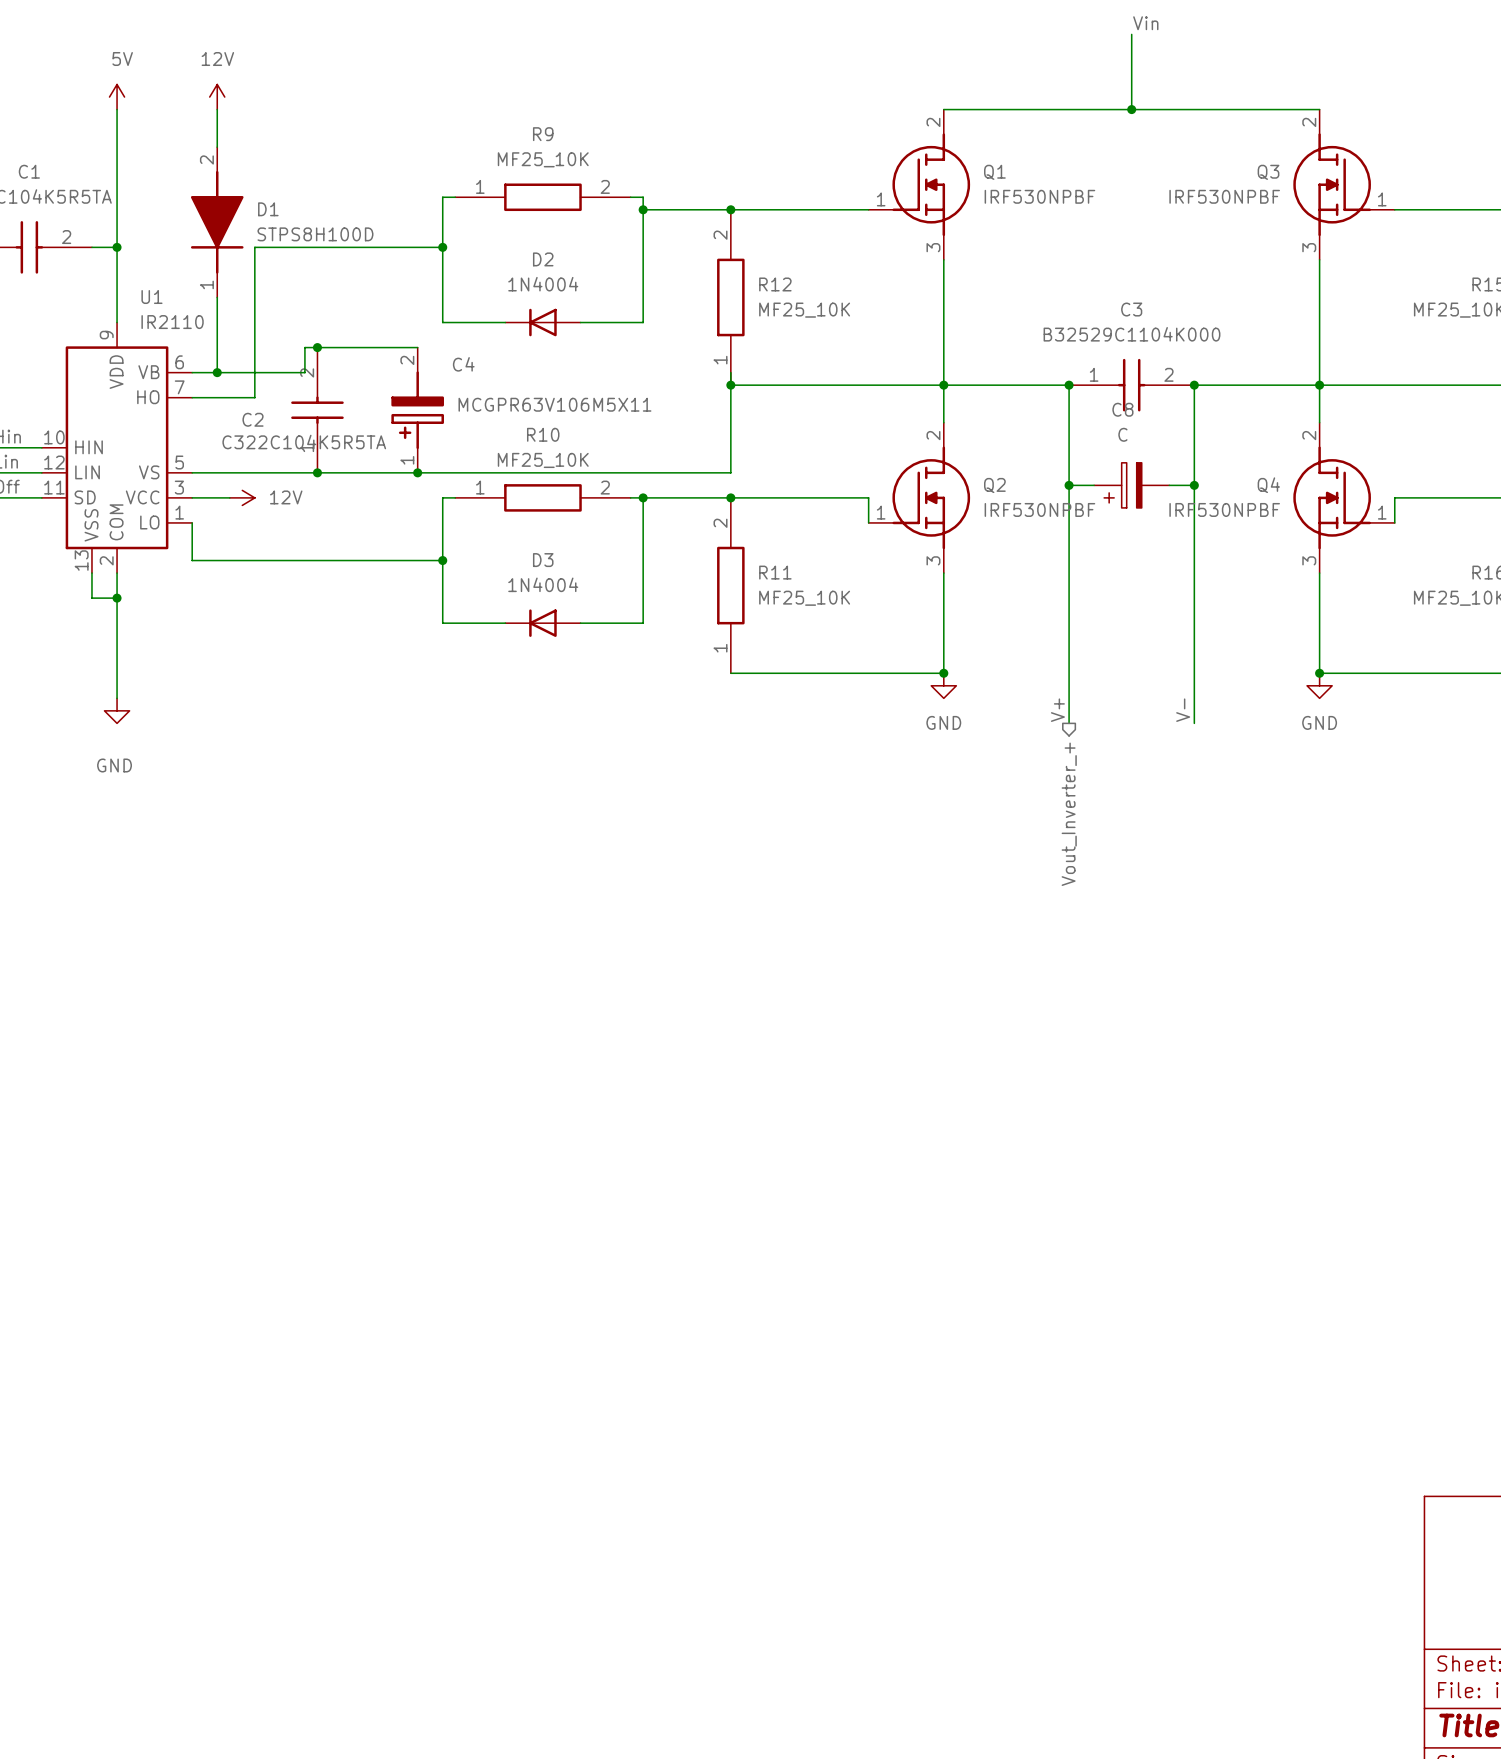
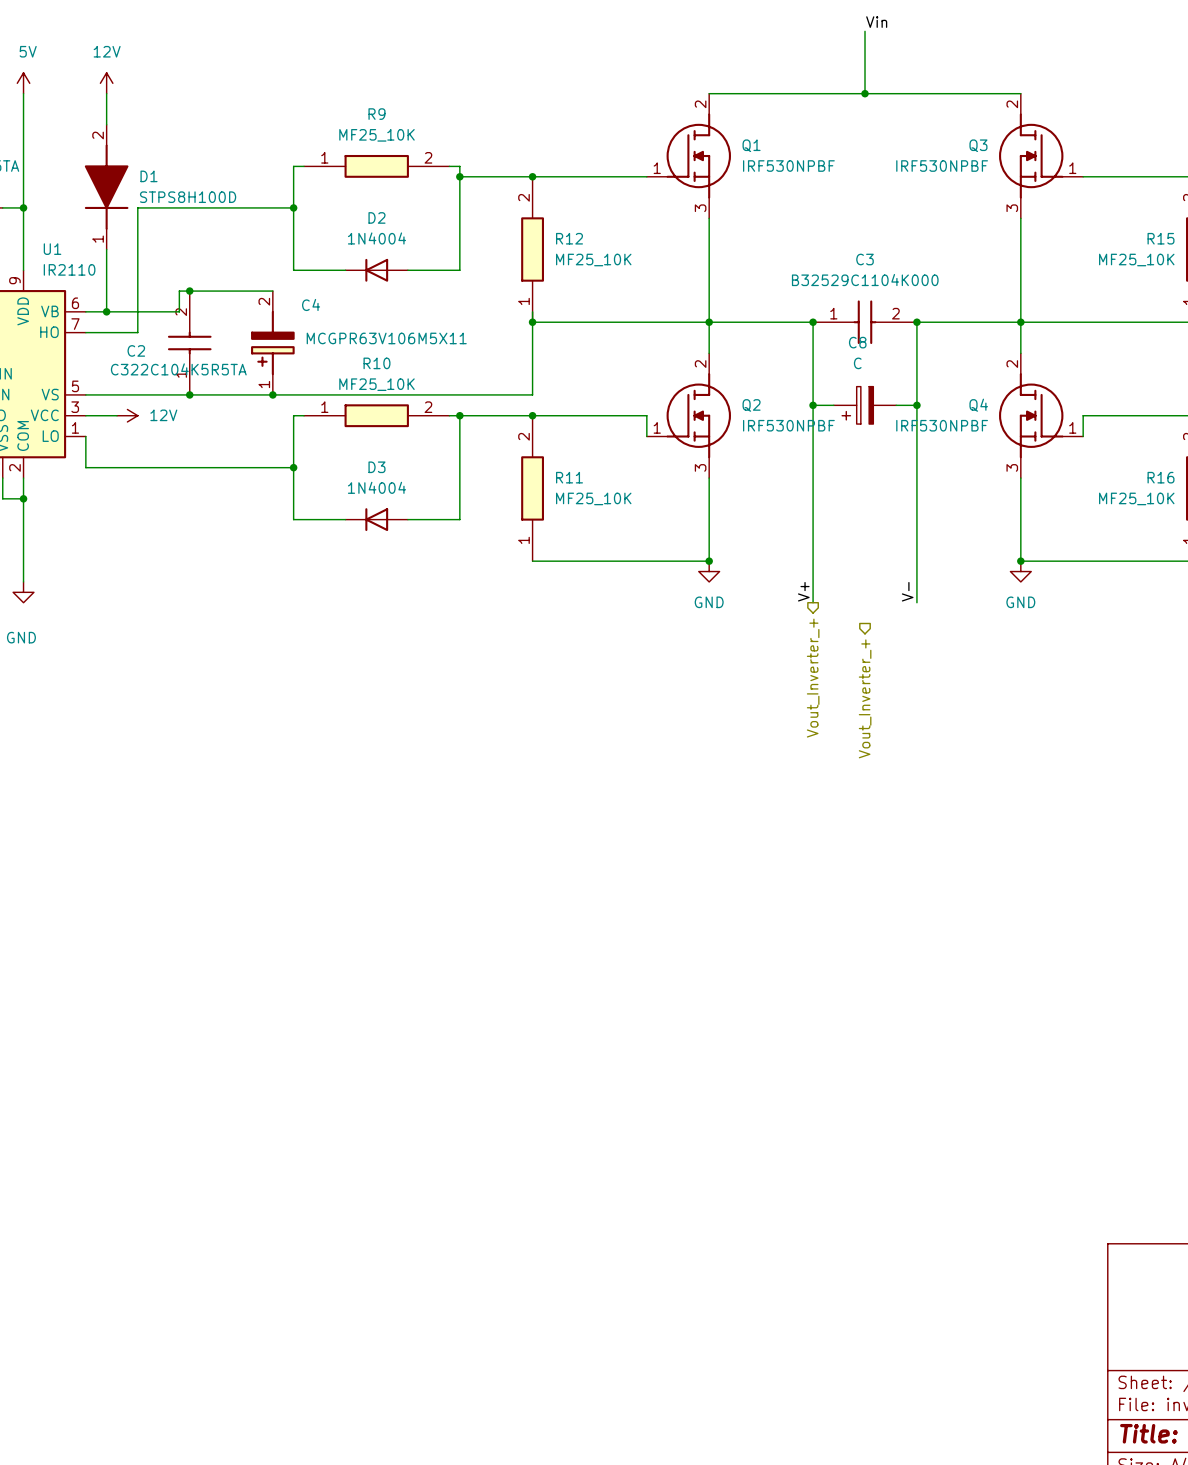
hierarchical label: none -> Vout_Inverter_+ (865, 698)

